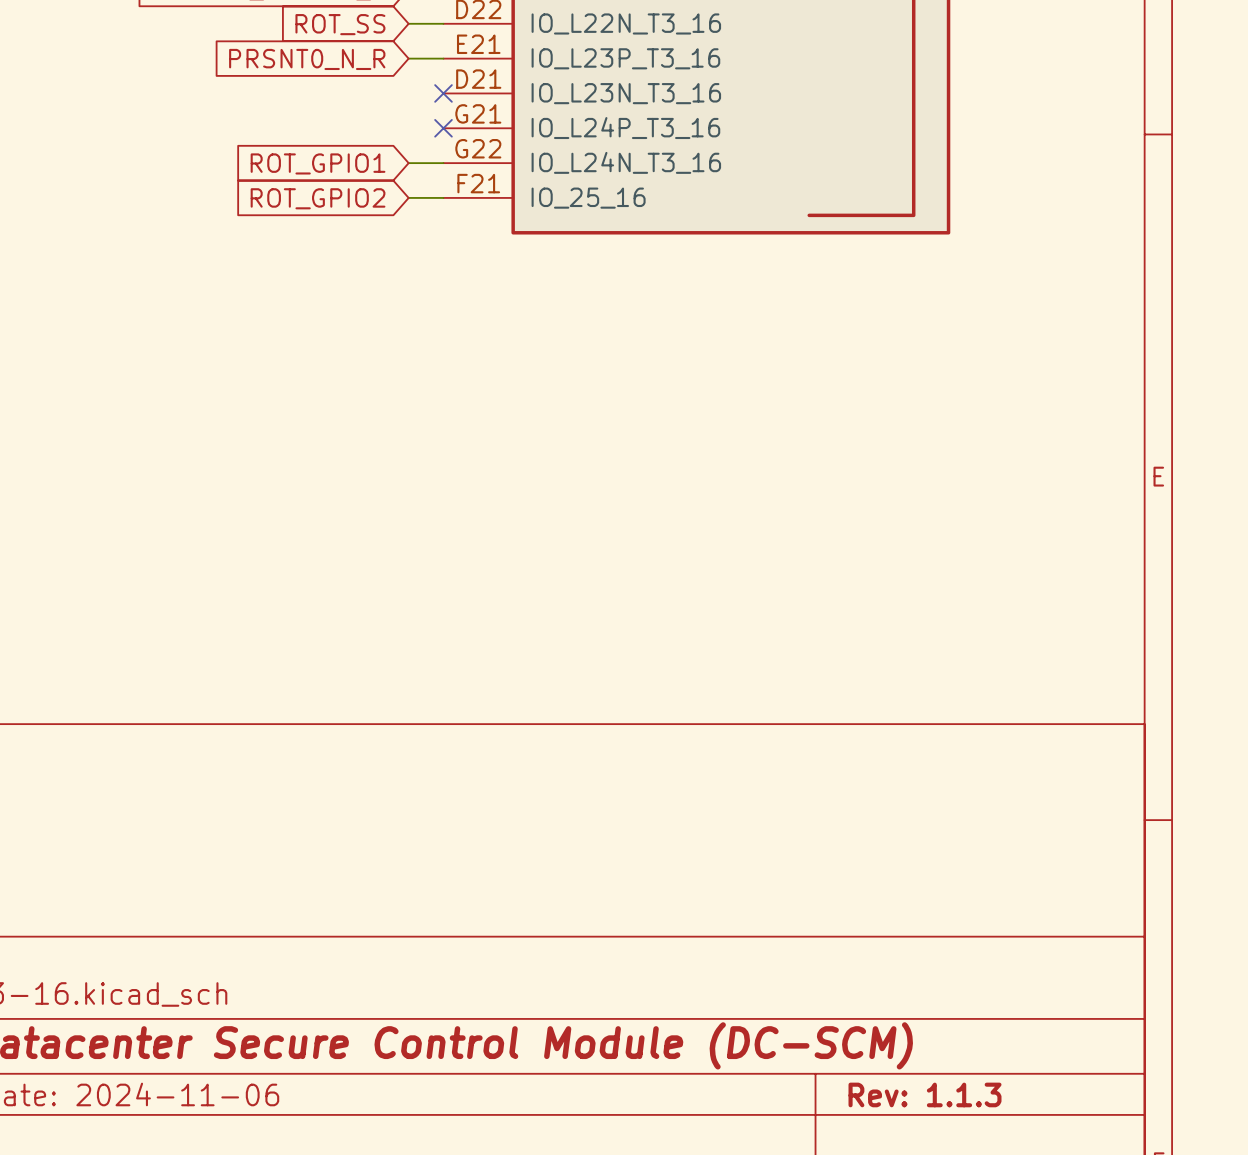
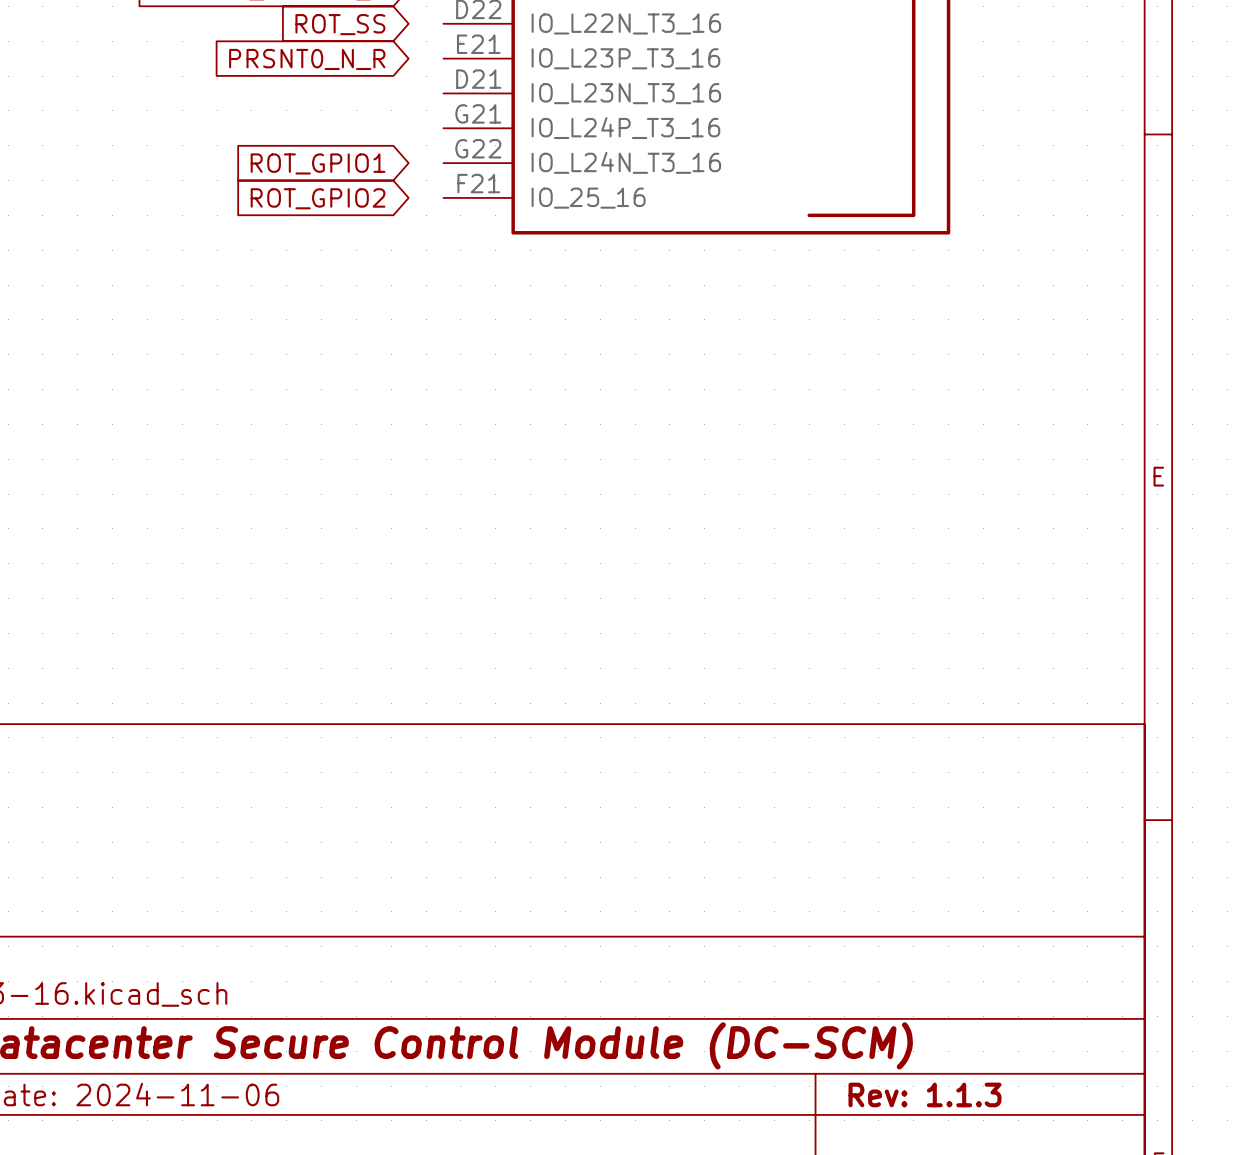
wire: (408, 23) (443, 23) -> none
wire: (408, 58) (443, 58) -> none
no-connect mark: (443, 93) -> none
no-connect mark: (443, 128) -> none
wire: (408, 163) (443, 163) -> none
wire: (408, 197) (443, 197) -> none

